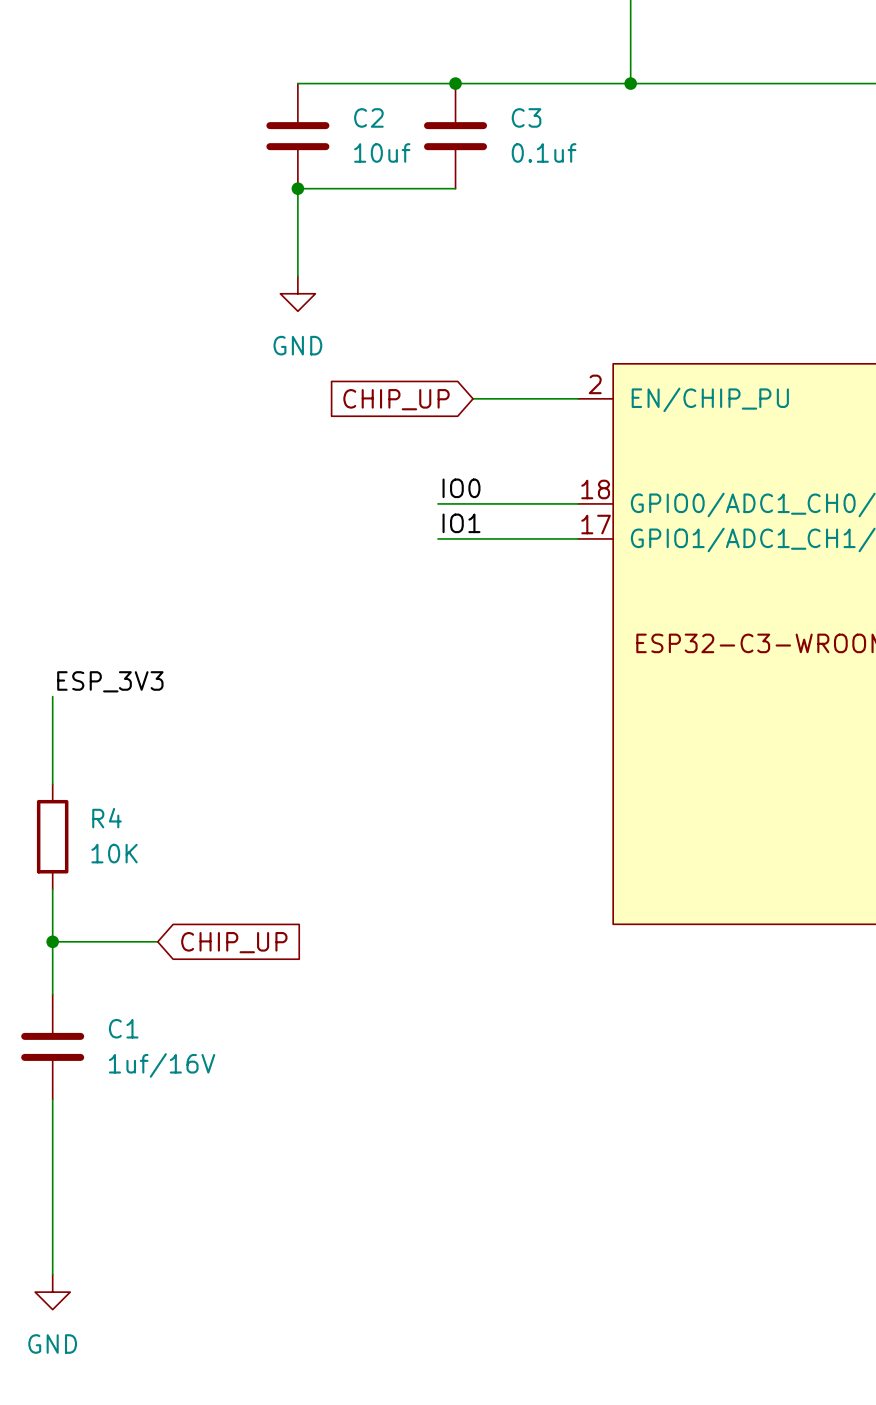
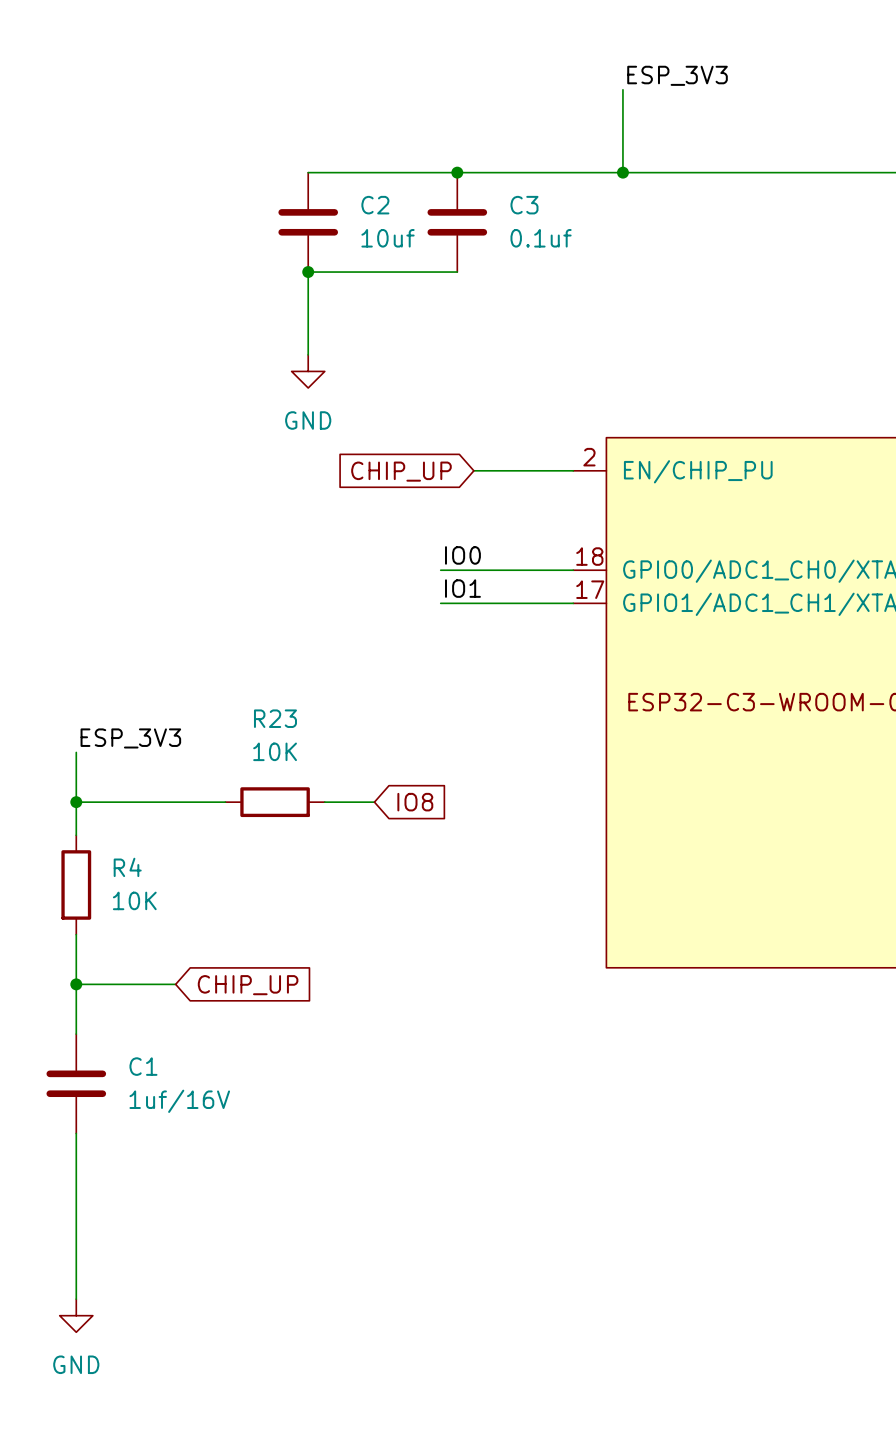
wire: none -> (76, 802) (225, 802)
junction: none -> (76, 802)
R23: none -> 10K (275, 802)
wire: none -> (324, 802) (374, 802)
global label: none -> IO8 (415, 802)

